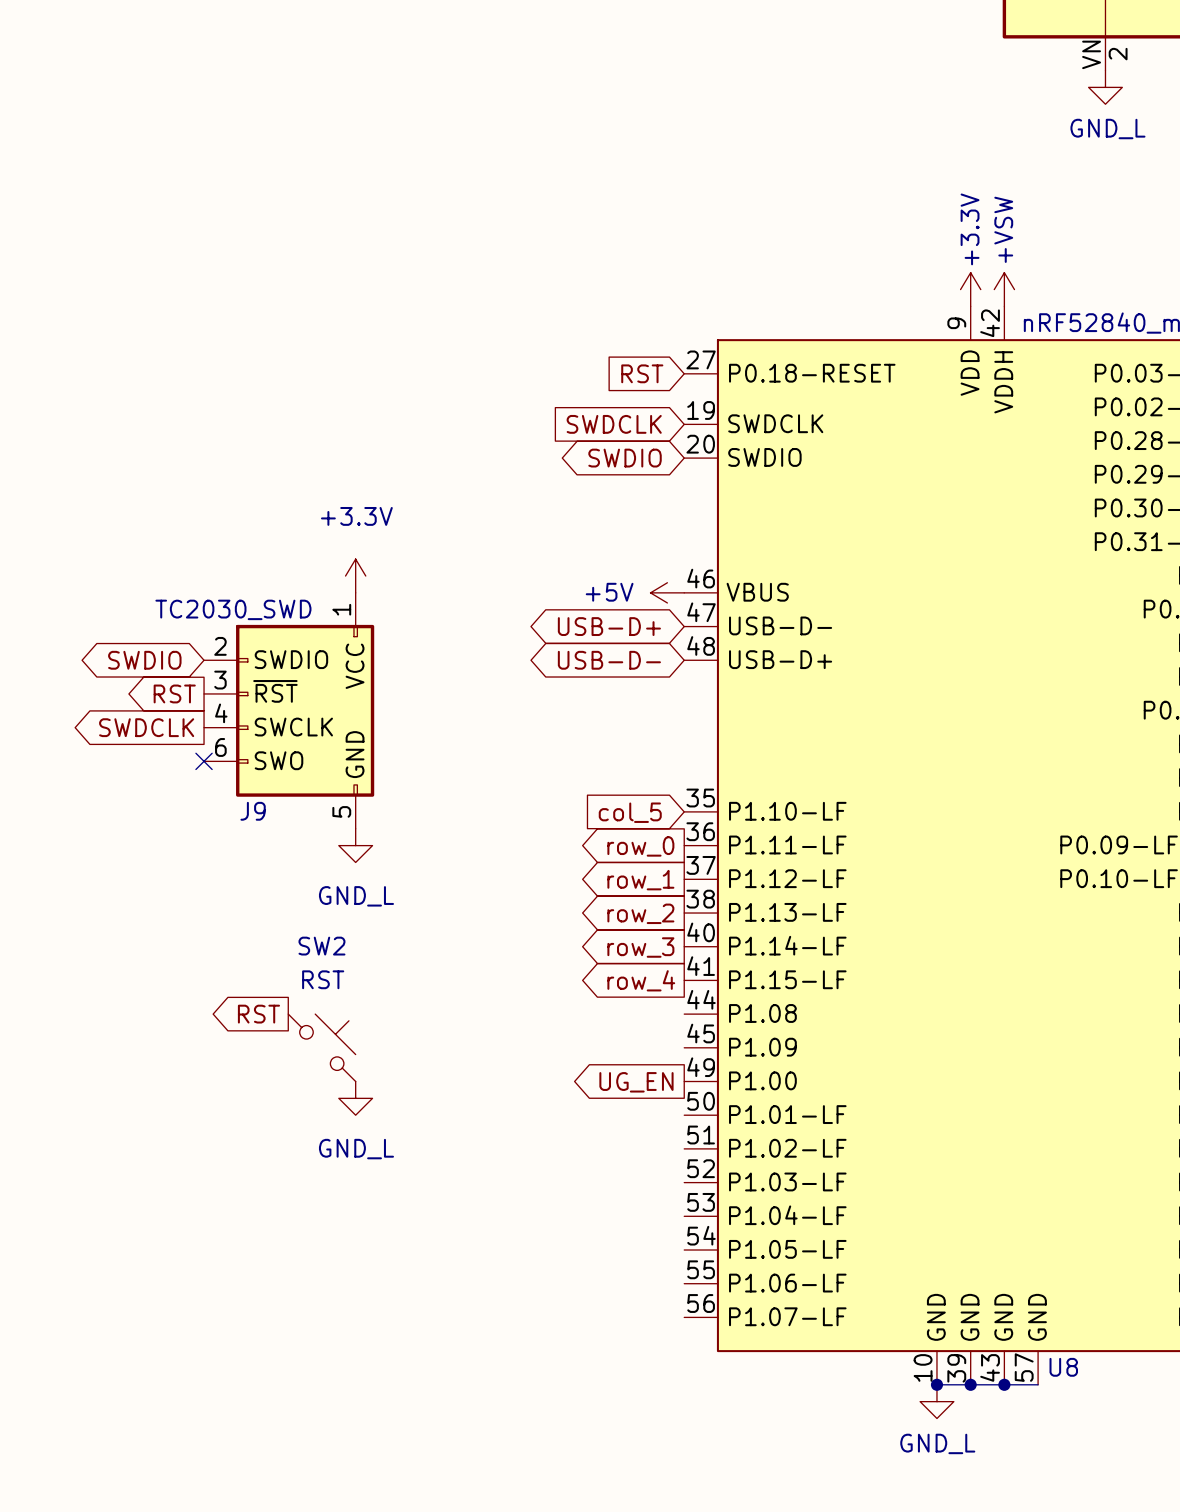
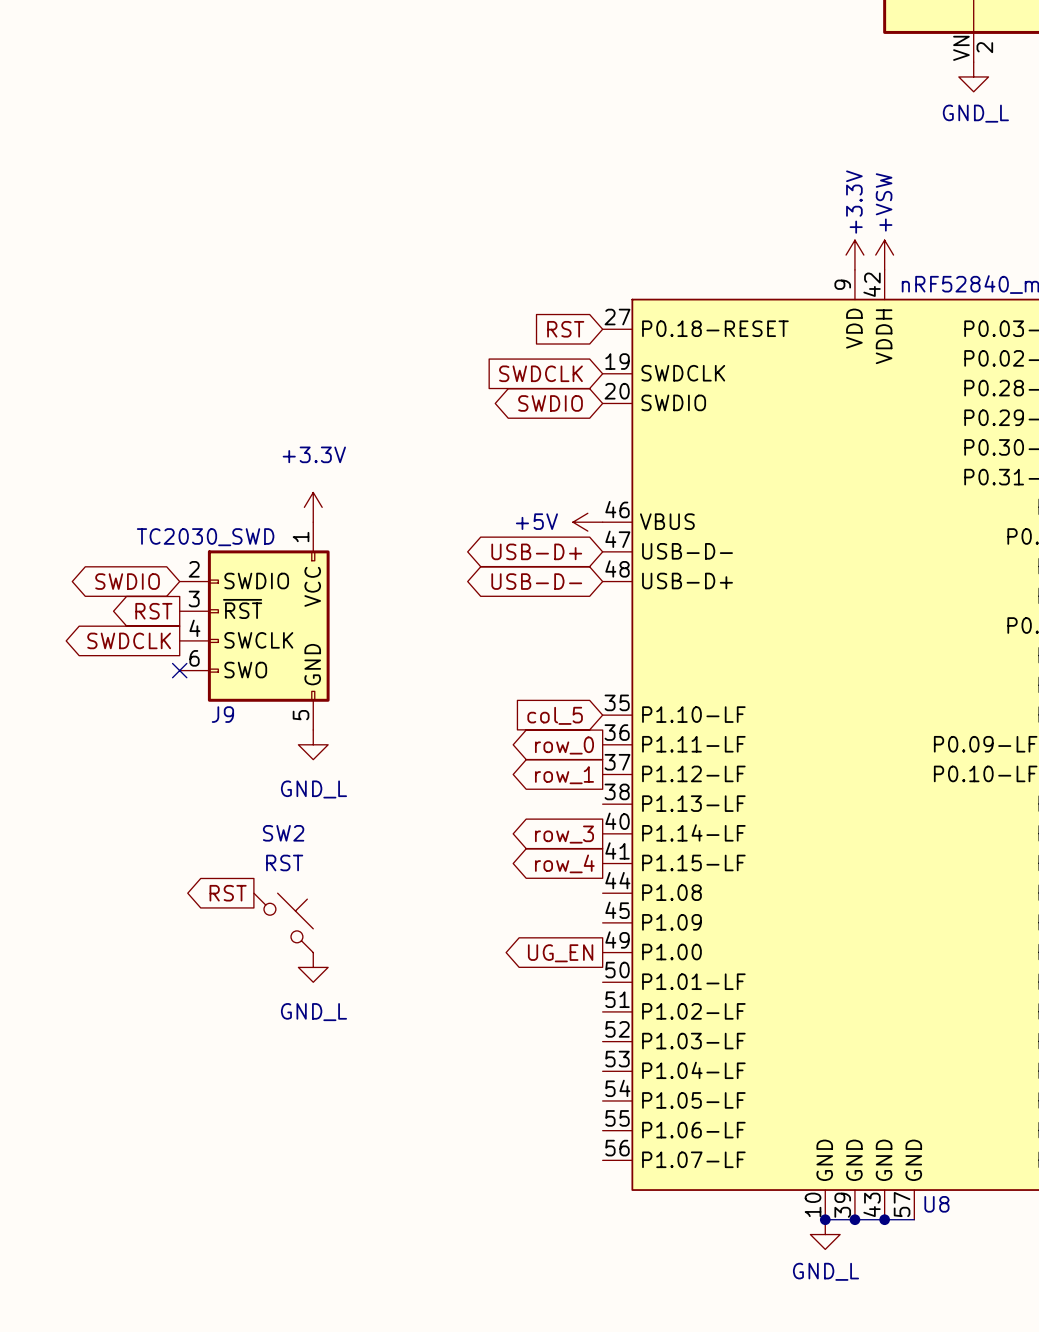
global label: row_2 (640, 913) -> none

